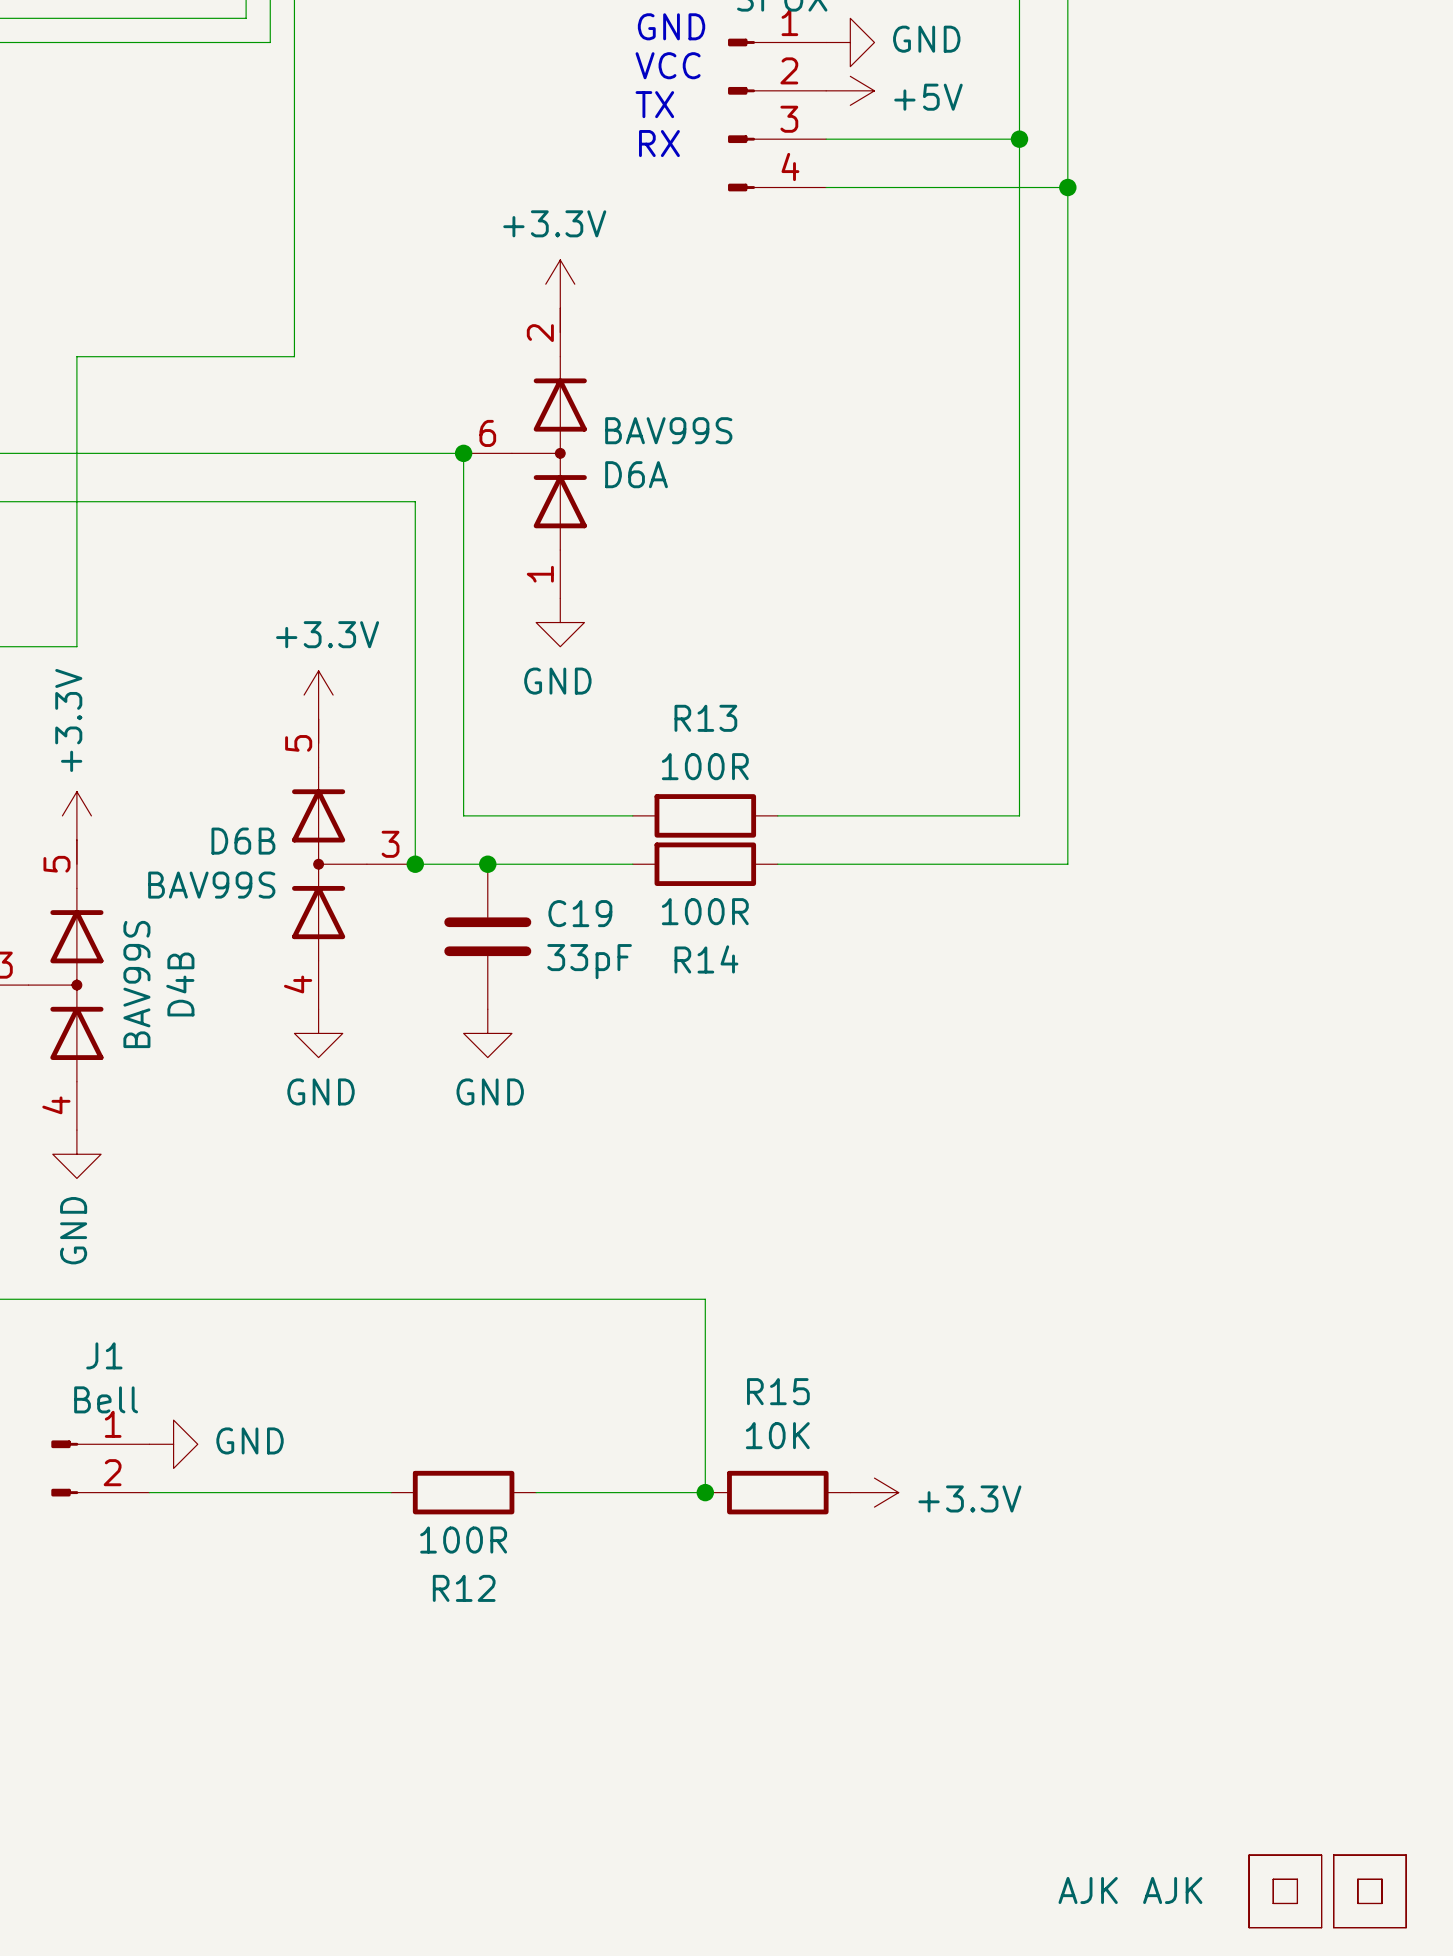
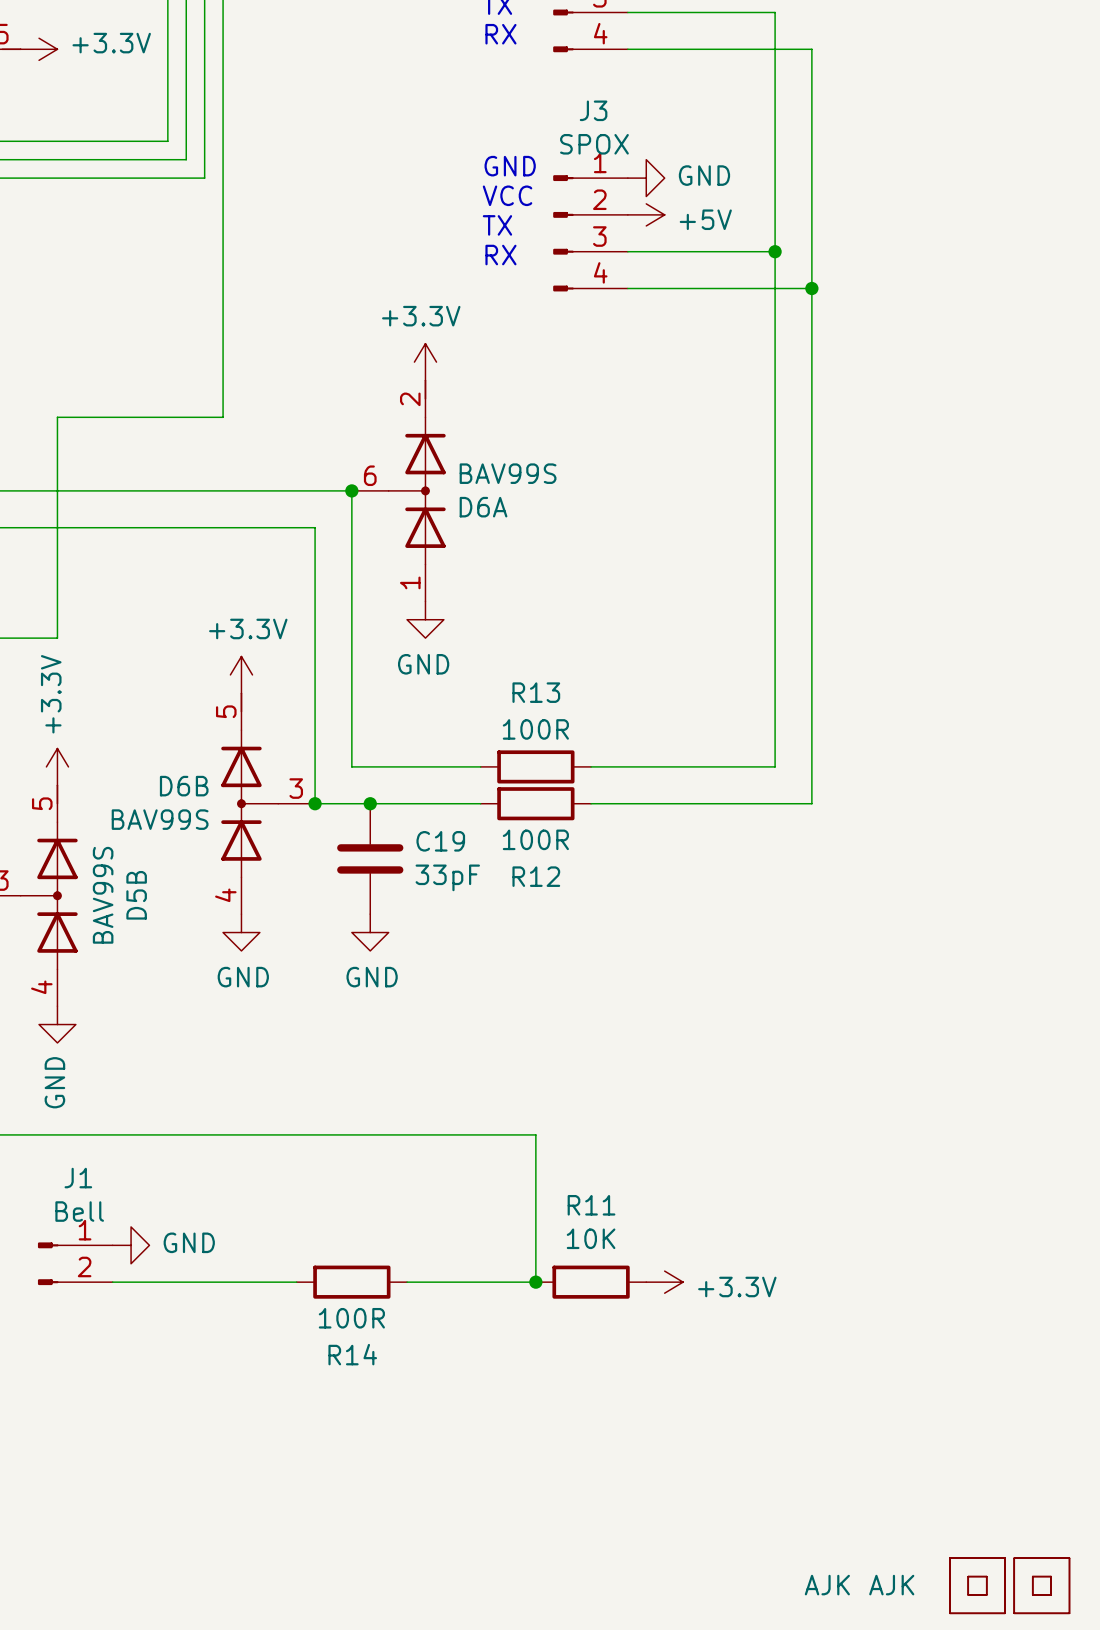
R14 name: R14 (706, 959) -> R12 (536, 876)
D4B name: D4B (180, 984) -> D5B (136, 895)
R15 name: R15 (778, 1391) -> R11 (591, 1205)
R12 name: R12 (464, 1588) -> R14 (352, 1354)

